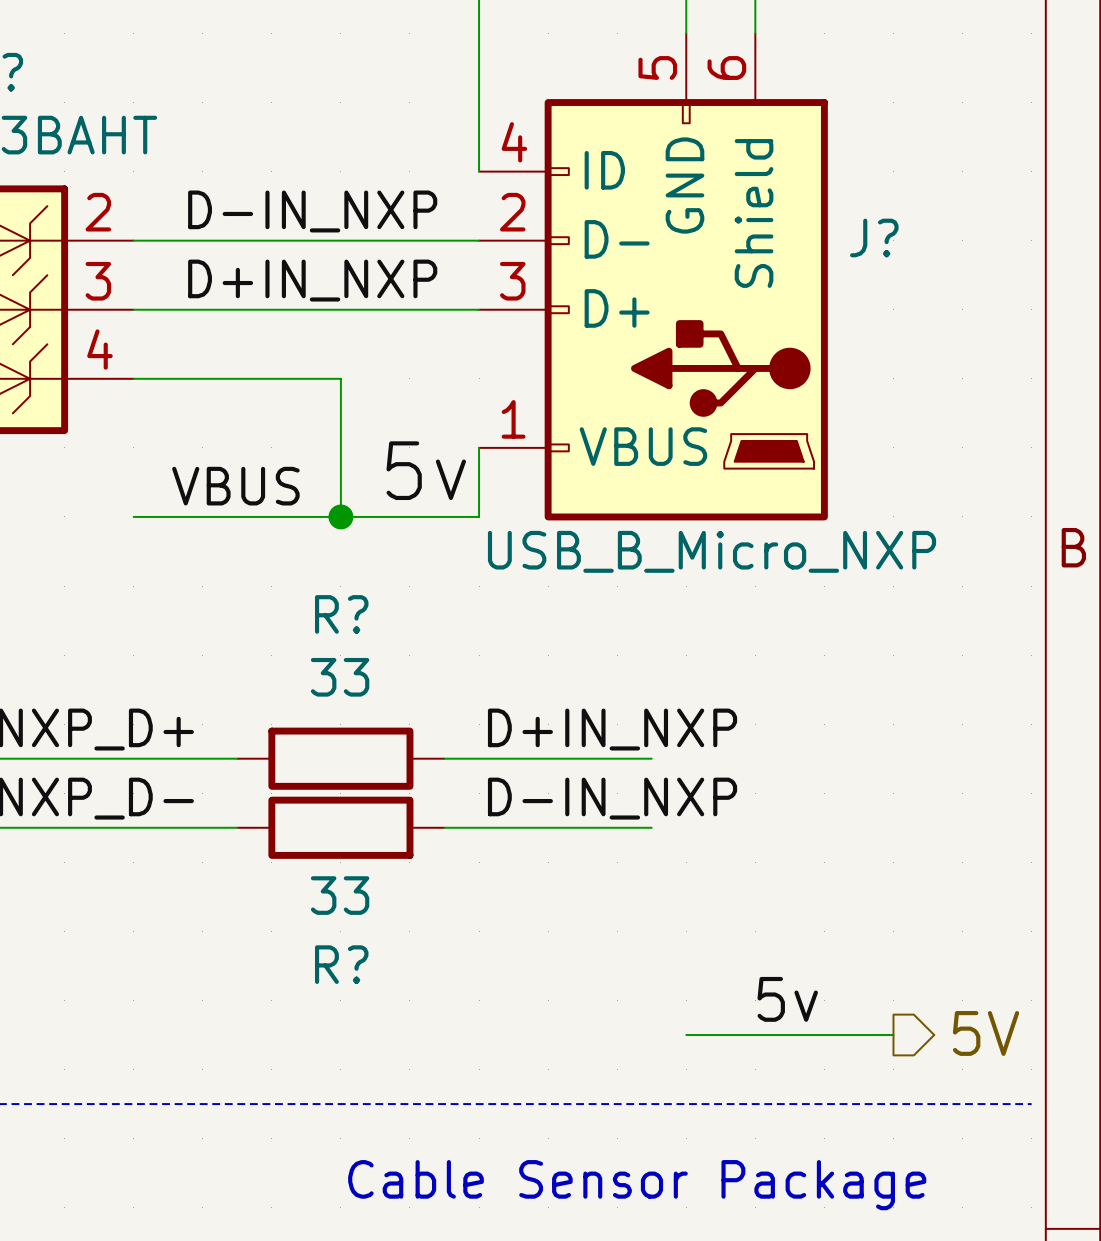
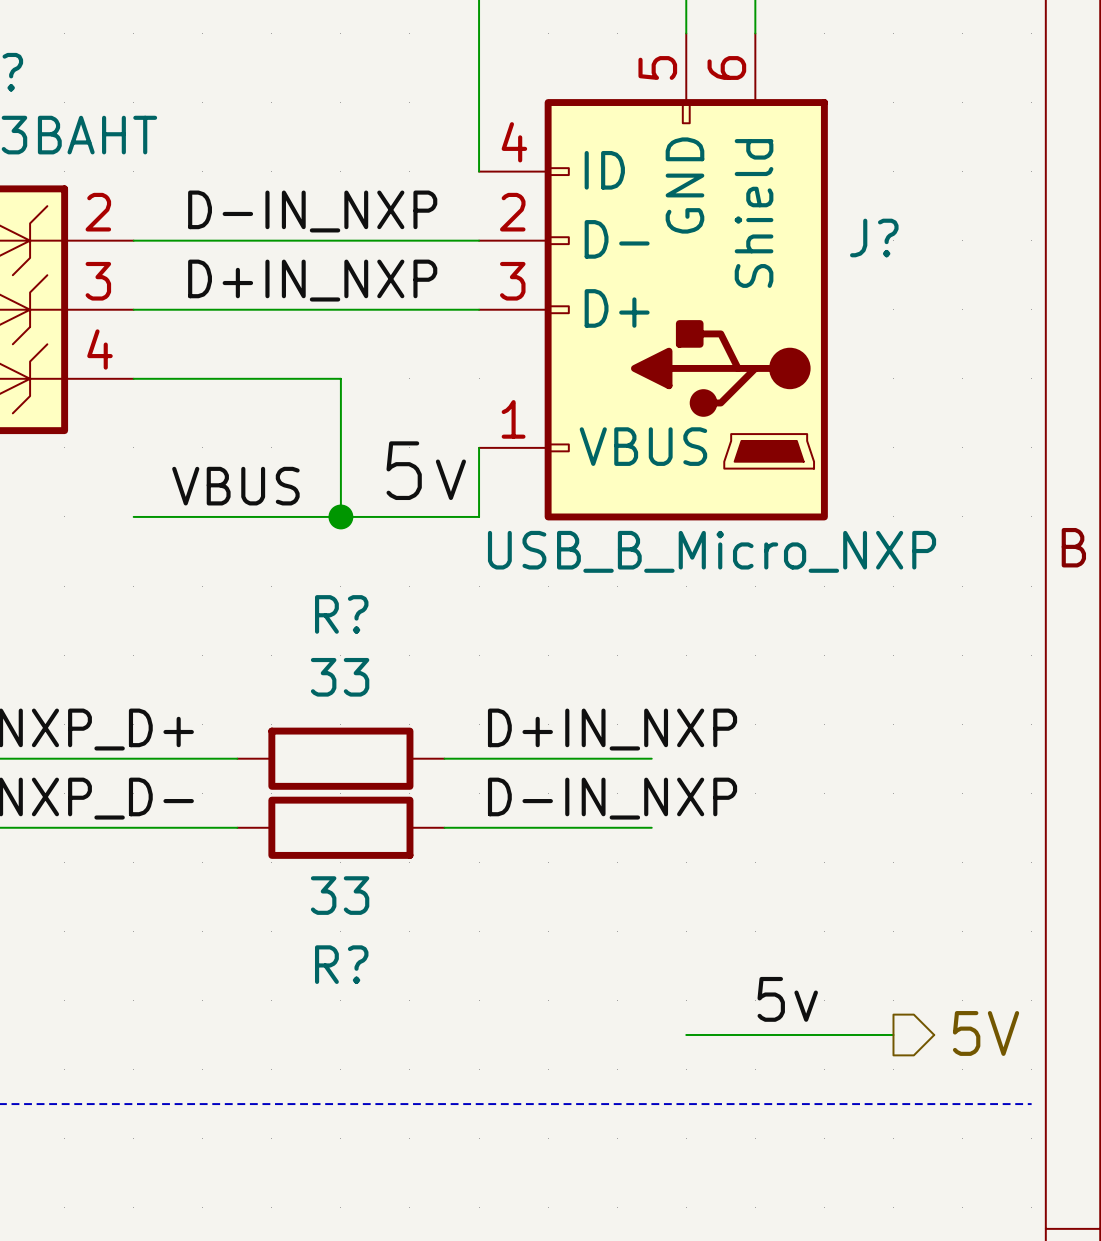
text: Cable Sensor Package (637, 1185) -> none

